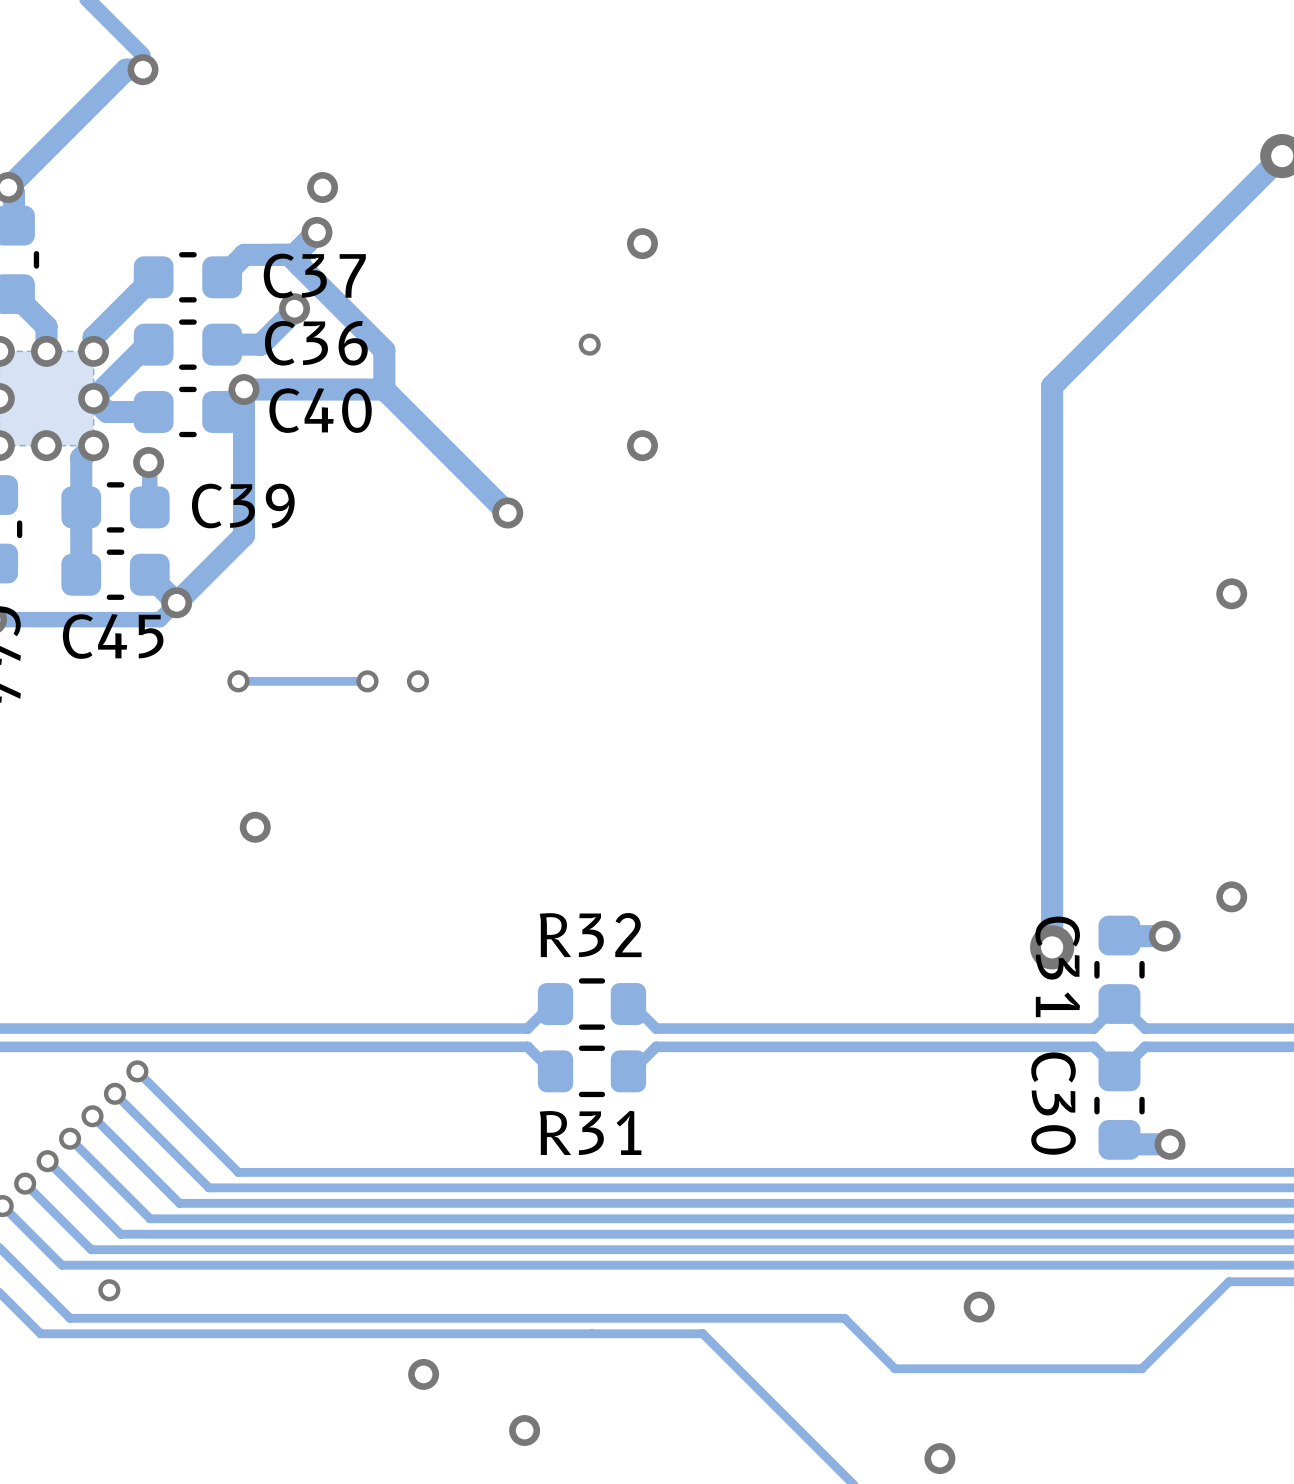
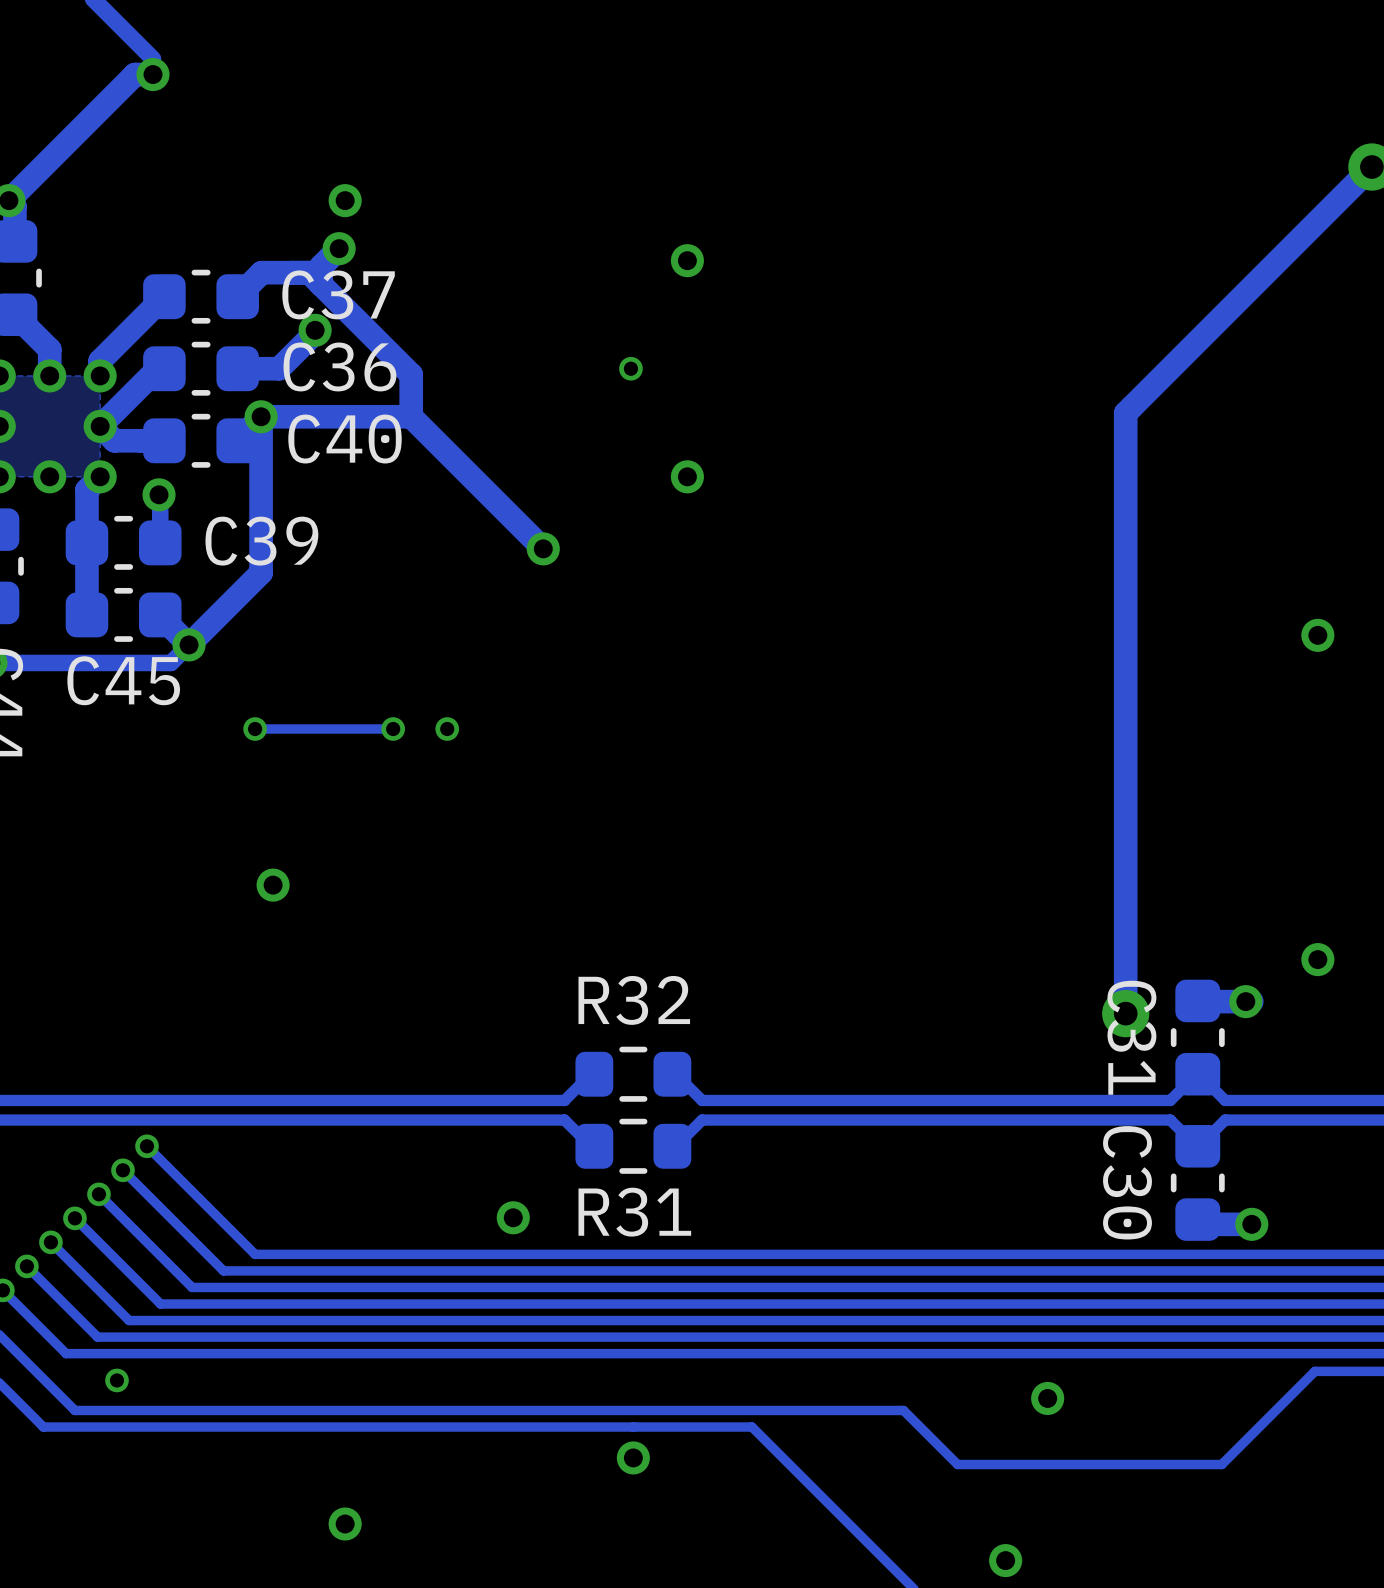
via: none -> (513, 1217)
via: none -> (633, 1457)
via: (423, 1374) -> none
via: none -> (345, 1524)
via: (524, 1430) -> none

